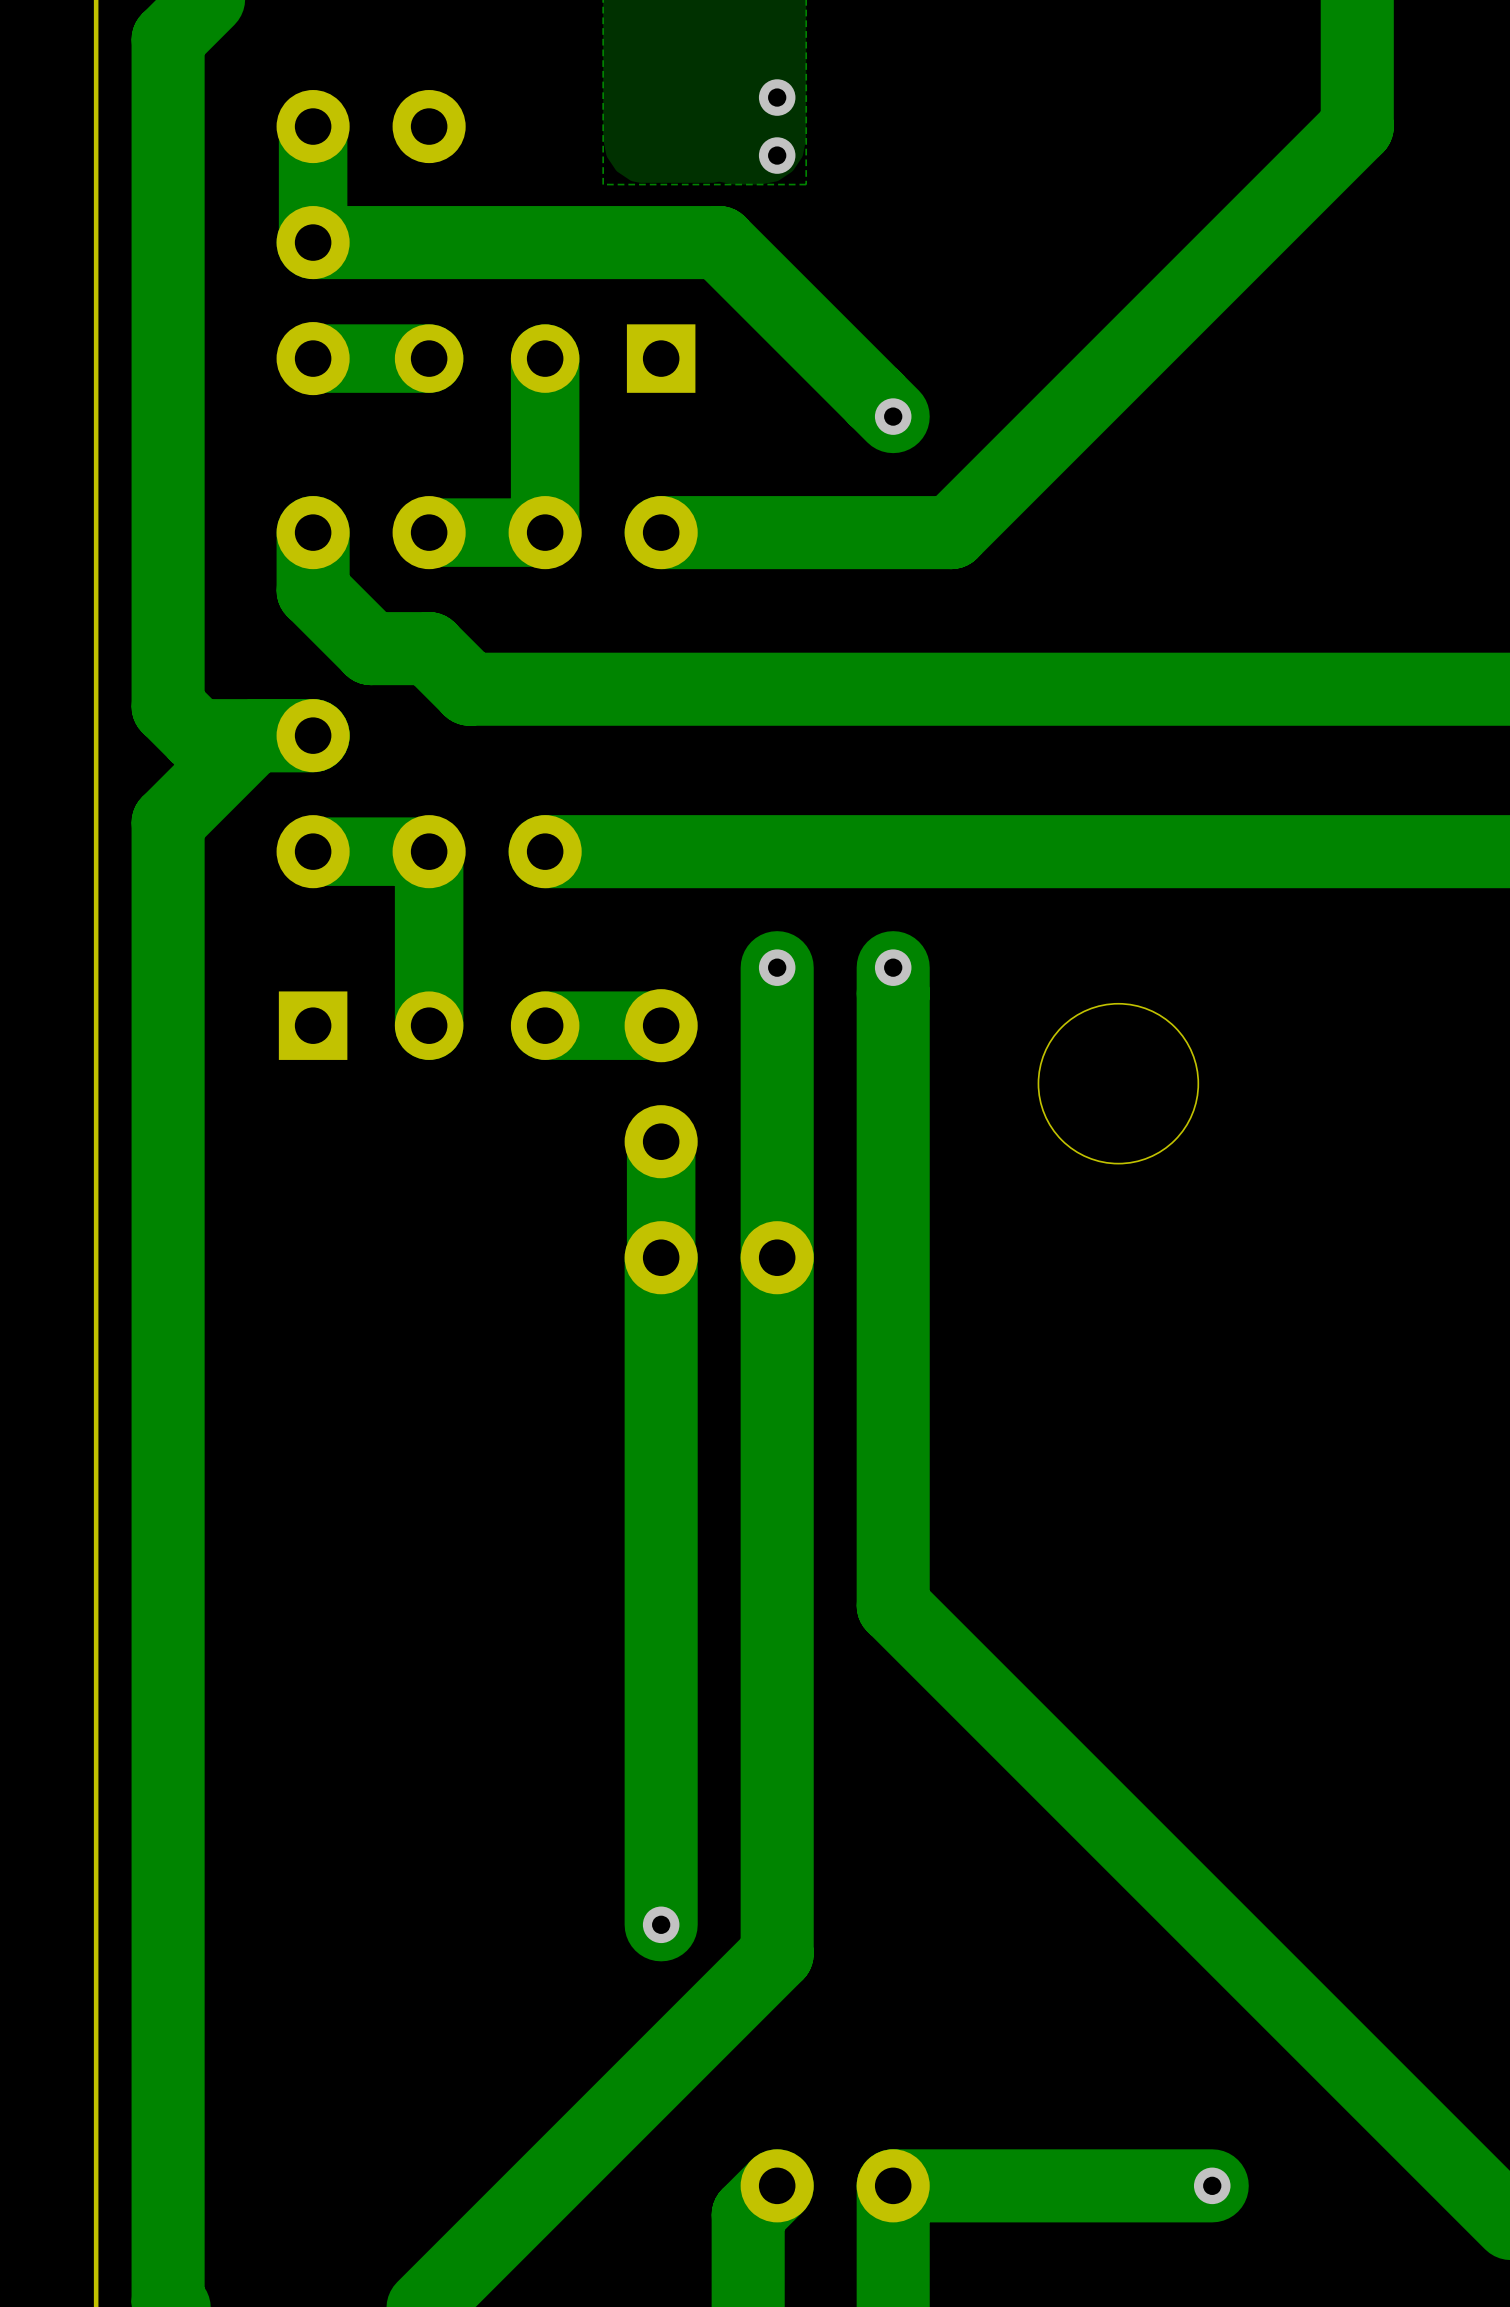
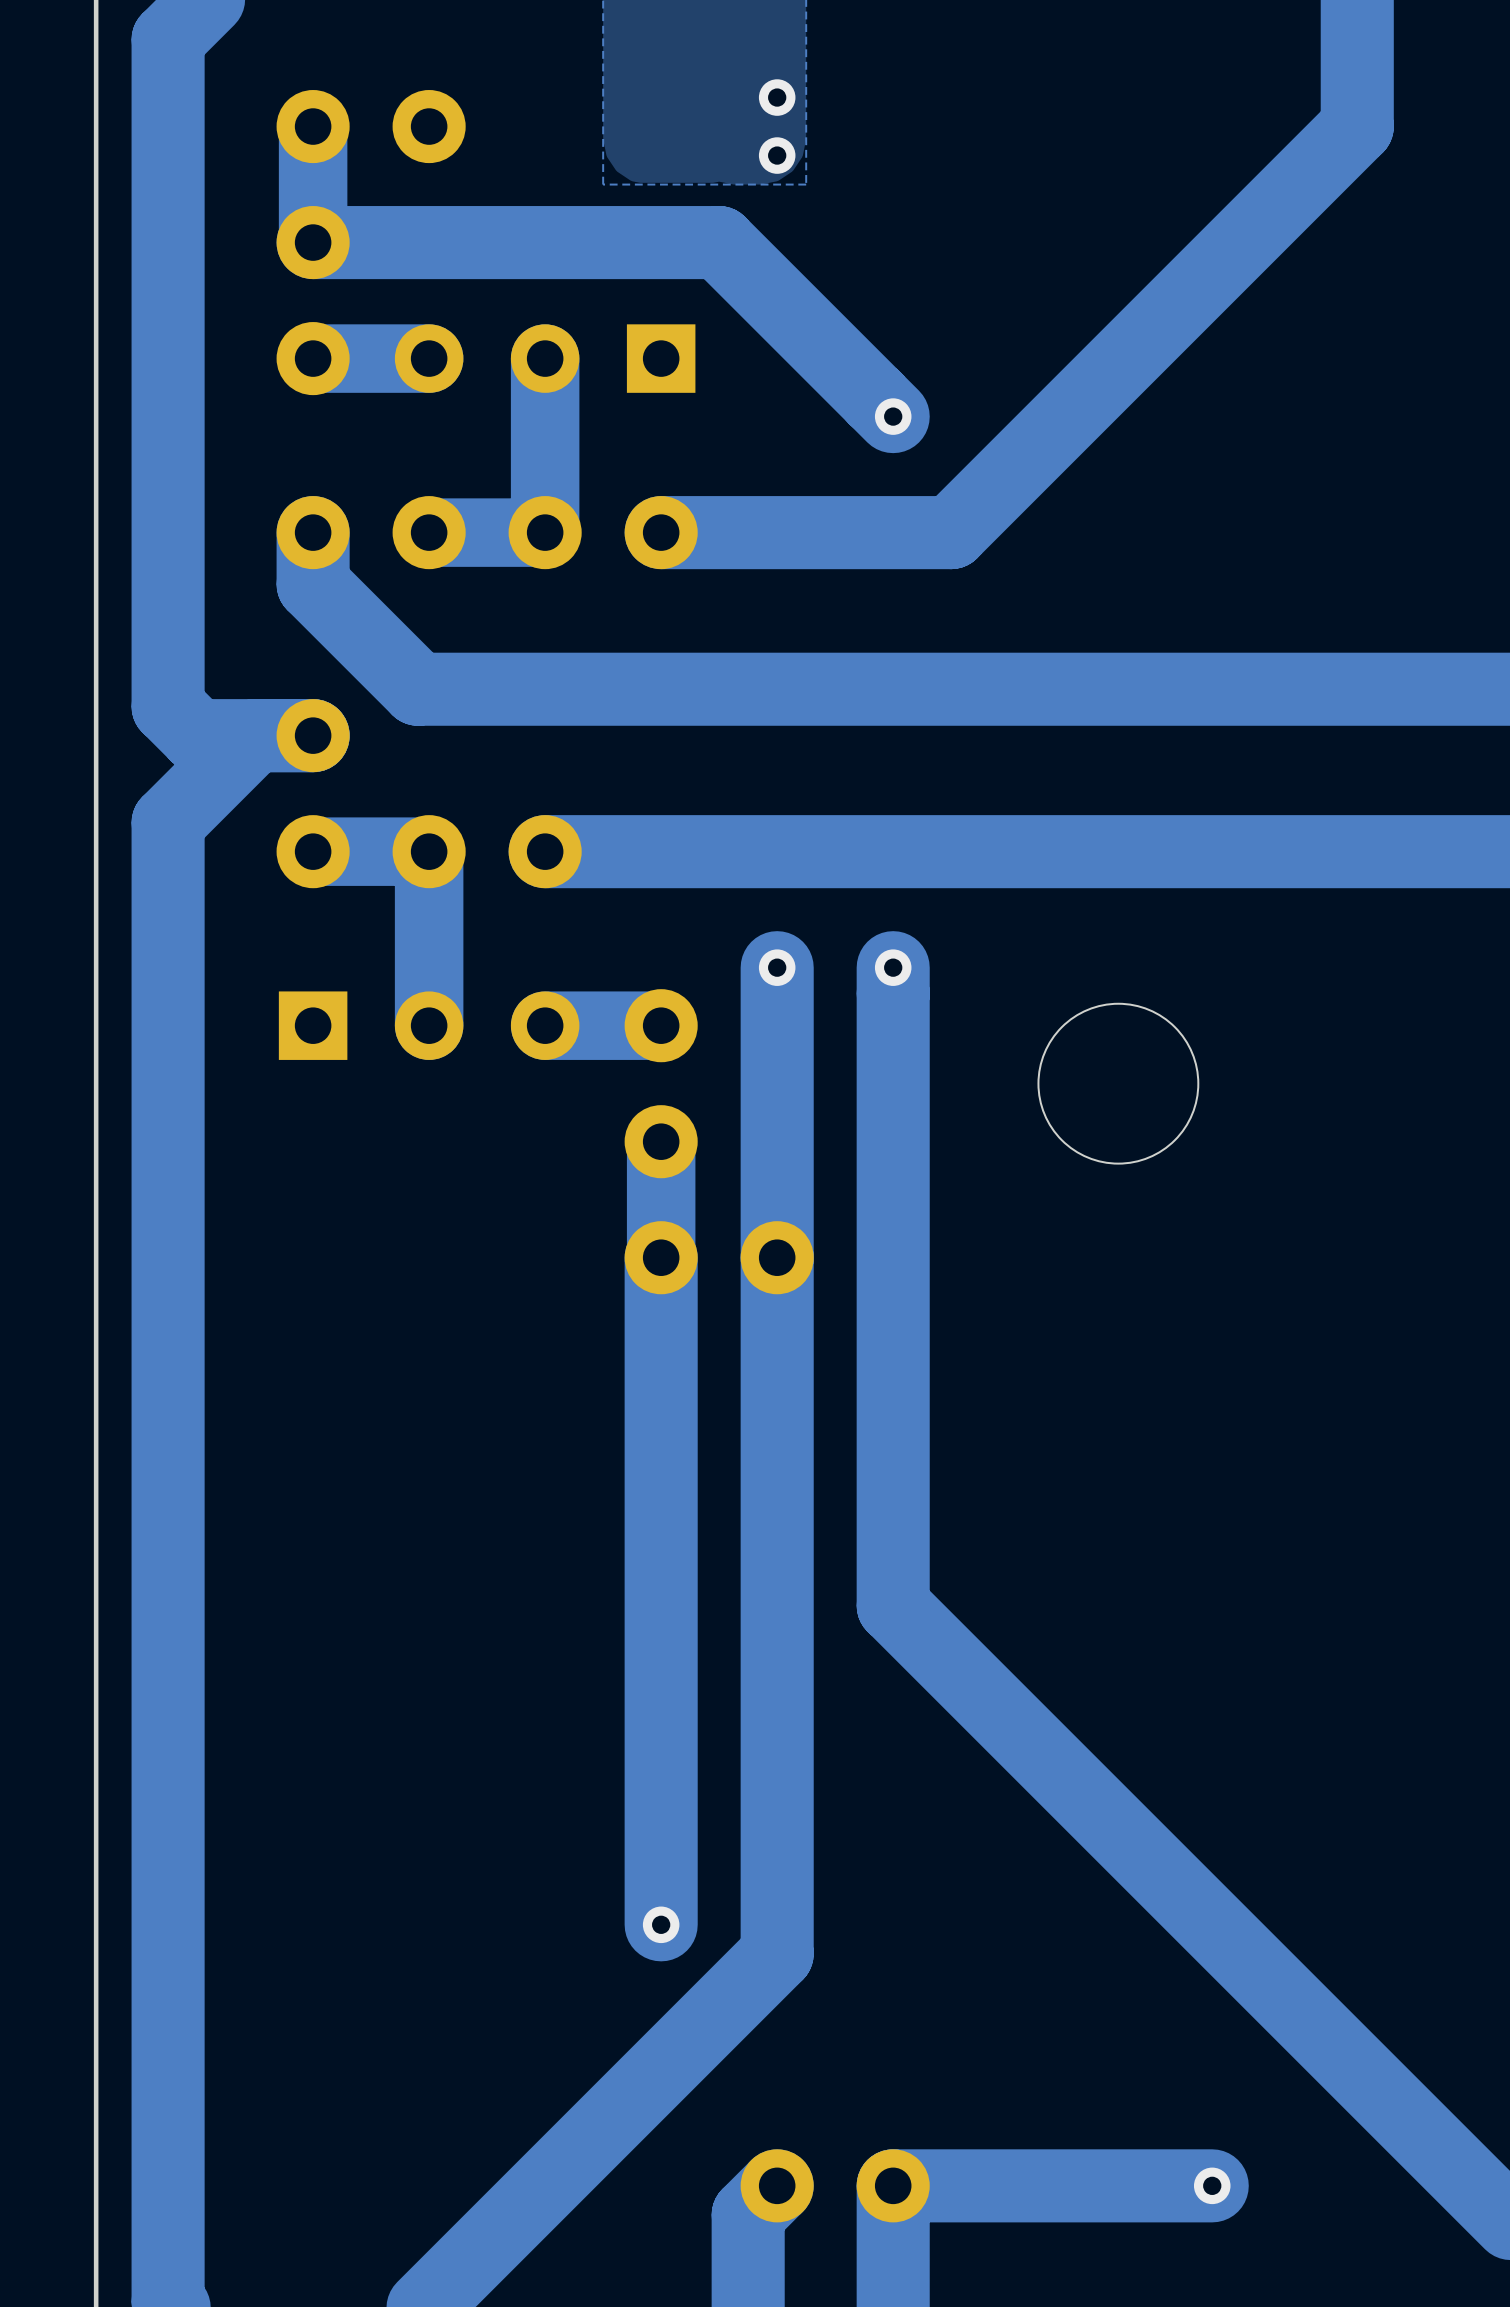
track: (313, 584) (313, 590) (371, 648) (429, 648) (469, 689) -> (313, 584) (418, 689) (469, 689)

